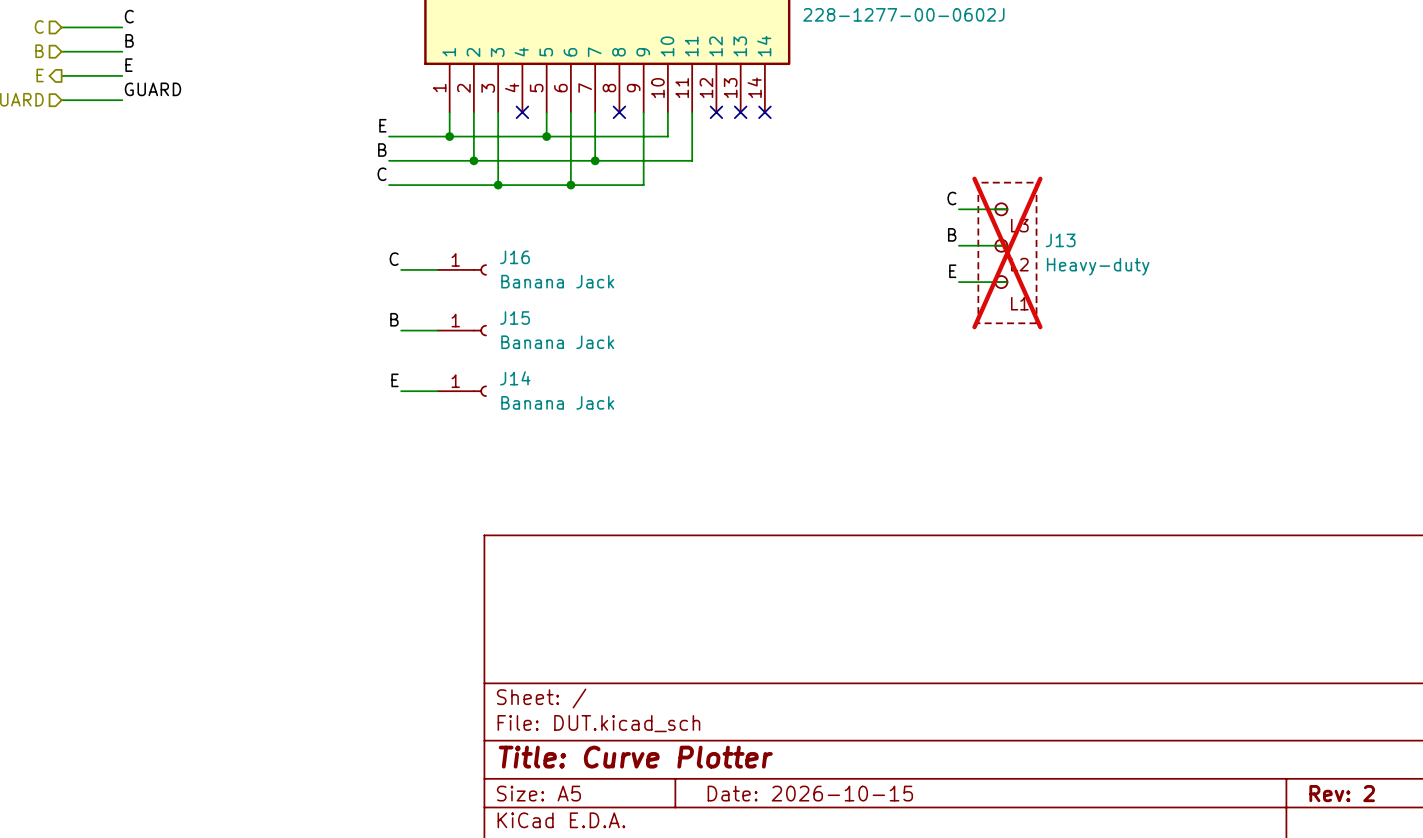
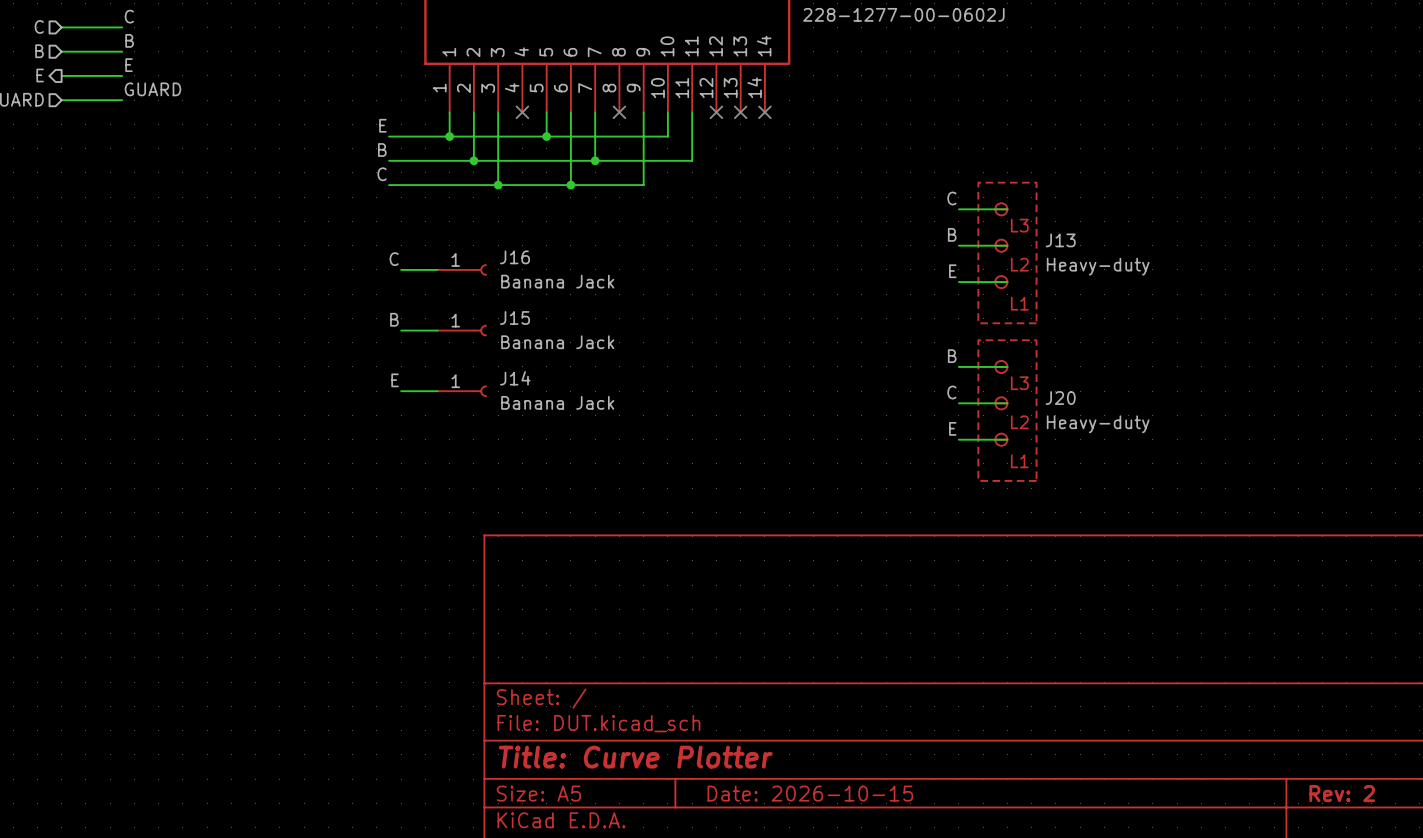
J13 do-not-place cross: (1007, 252) -> none
label: none -> B (952, 356)
wire: none -> (958, 366) (1007, 366)
label: none -> C (951, 392)
wire: none -> (958, 403) (1007, 403)
J20: none -> Heavy-duty (1007, 410)
label: none -> E (952, 428)
wire: none -> (958, 439) (1007, 439)

